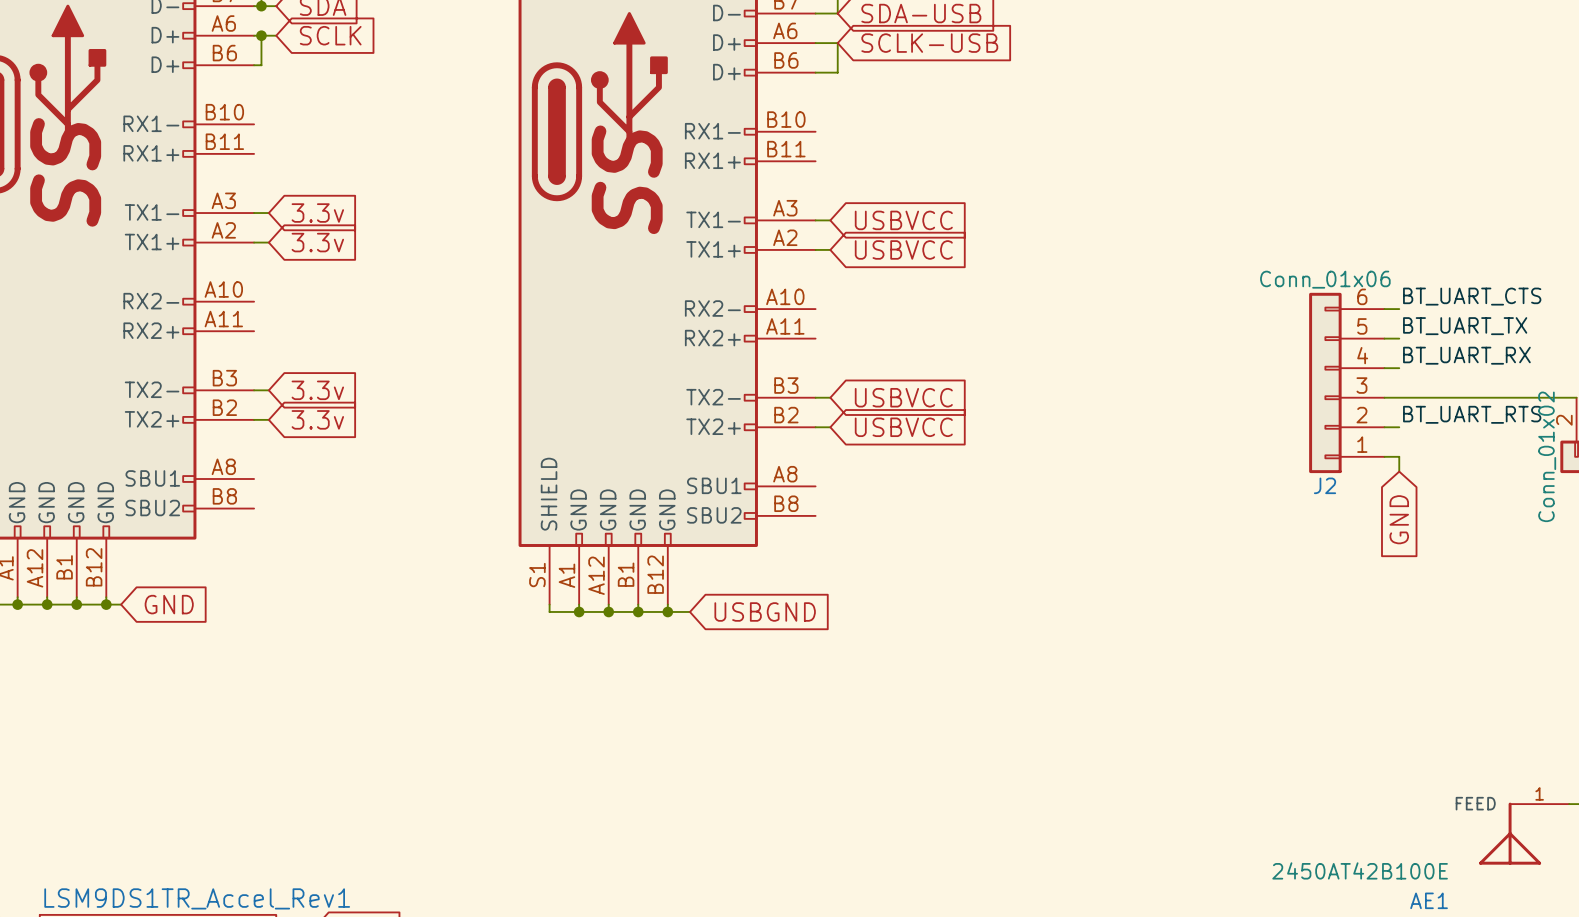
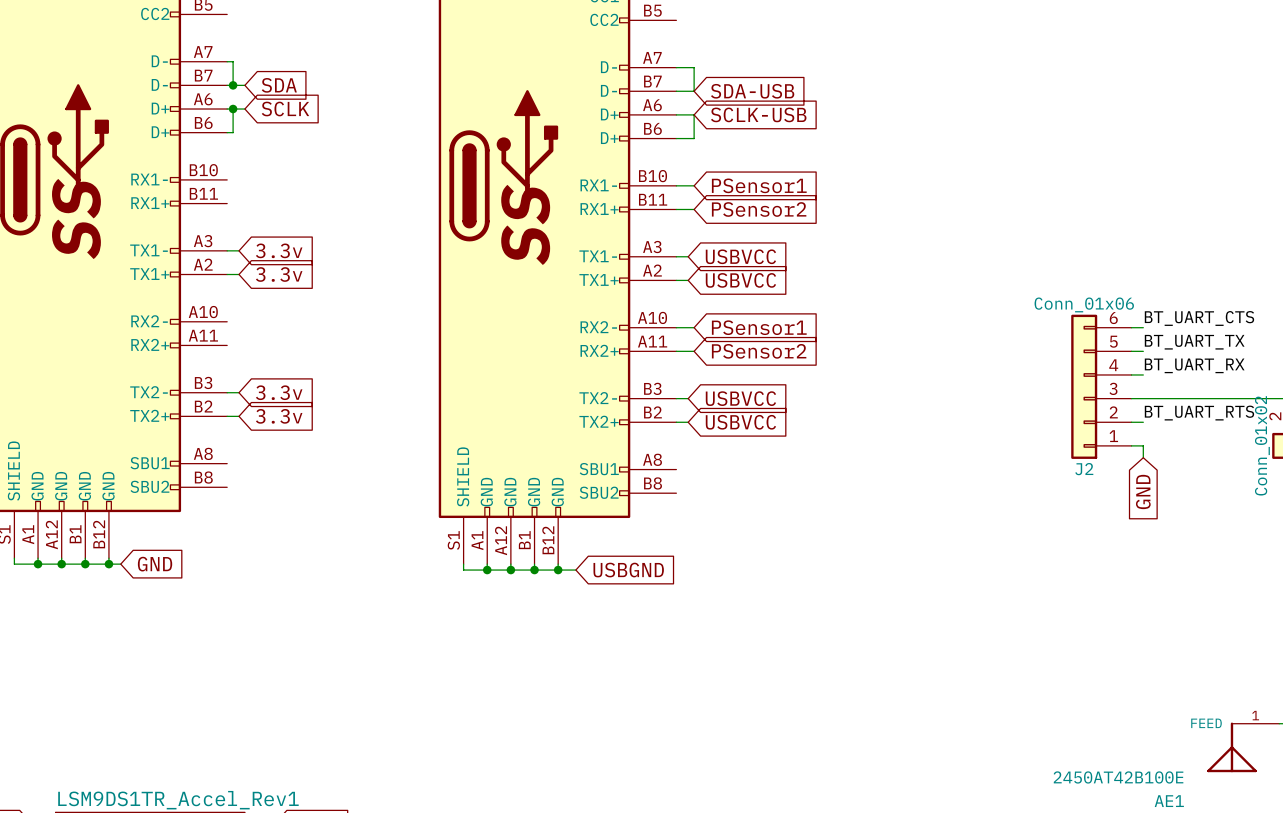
wire: none -> (676, 185) (694, 185)
global label: none -> PSensor1 (759, 185)
wire: none -> (676, 209) (694, 209)
global label: none -> PSensor2 (759, 209)
wire: none -> (676, 327) (694, 327)
global label: none -> PSensor1 (759, 327)
wire: none -> (676, 351) (694, 351)
global label: none -> PSensor2 (759, 351)

